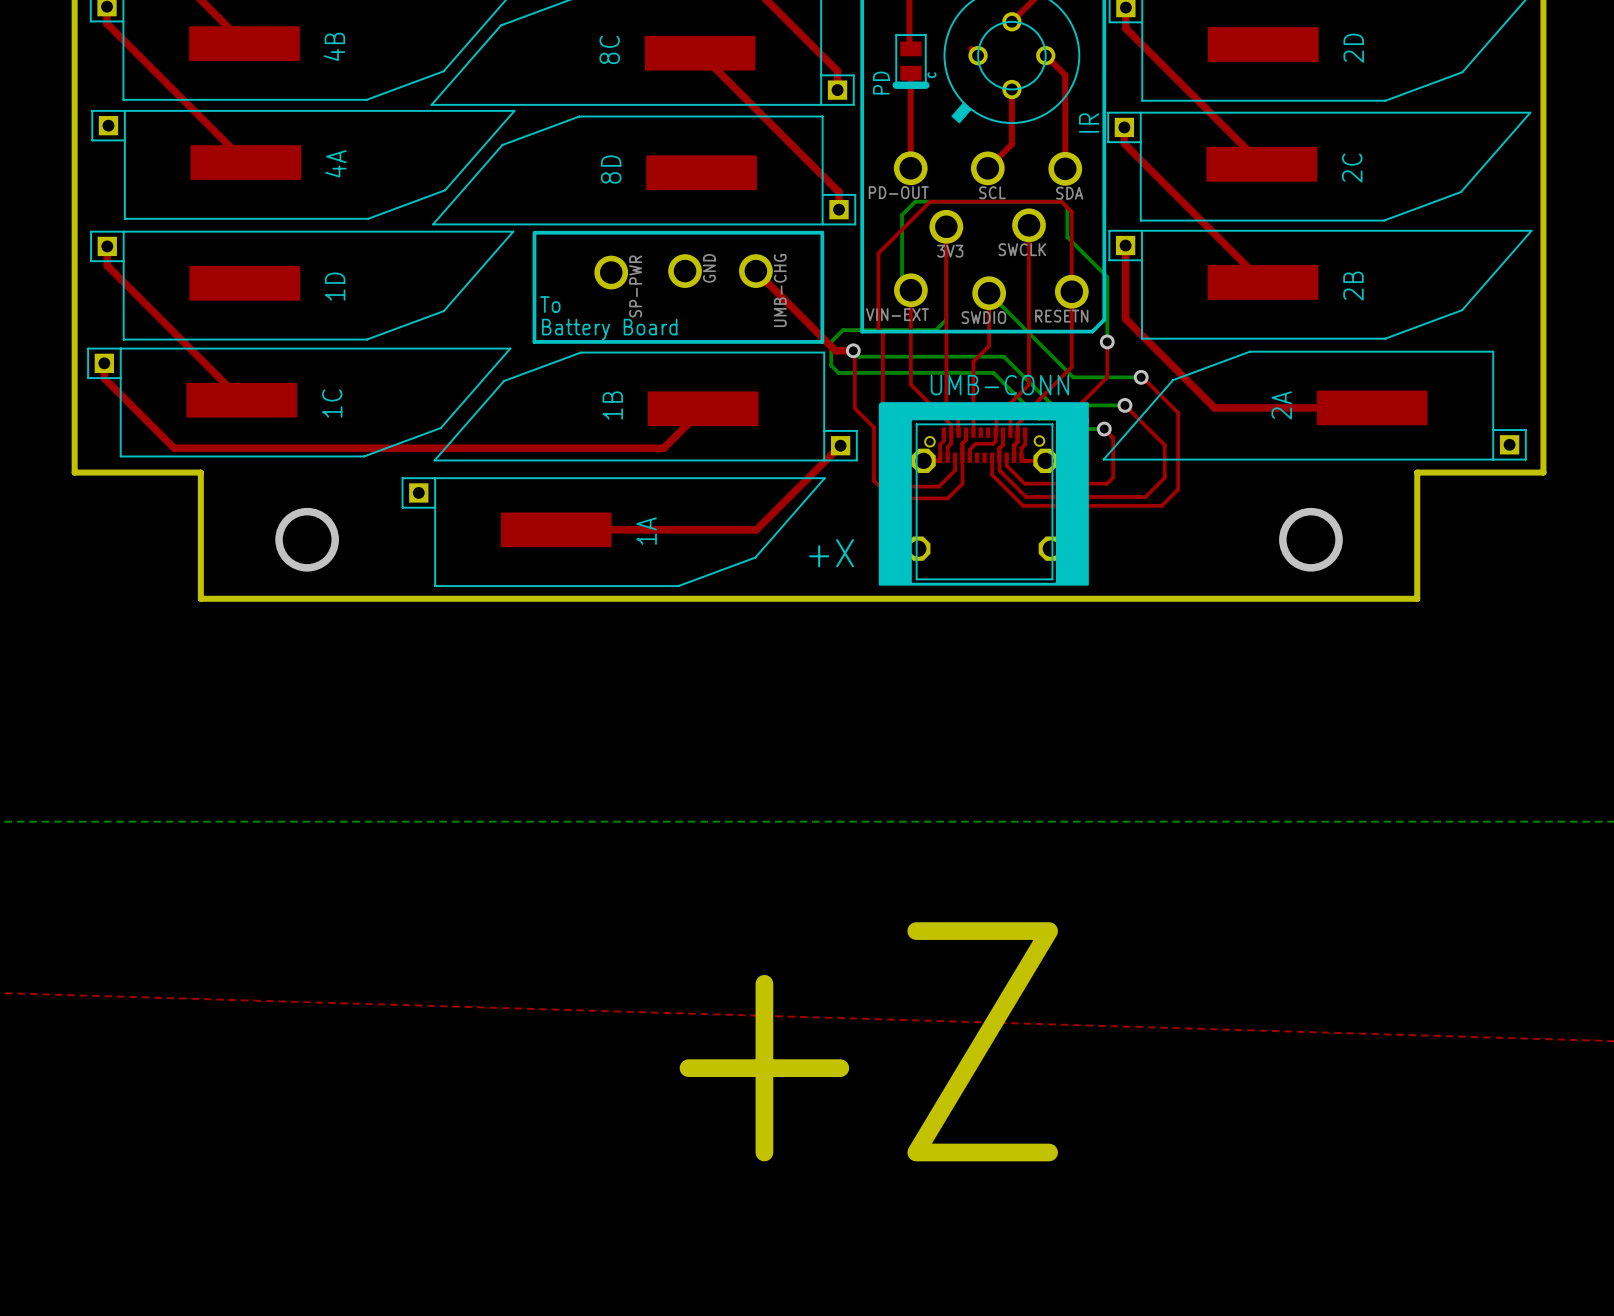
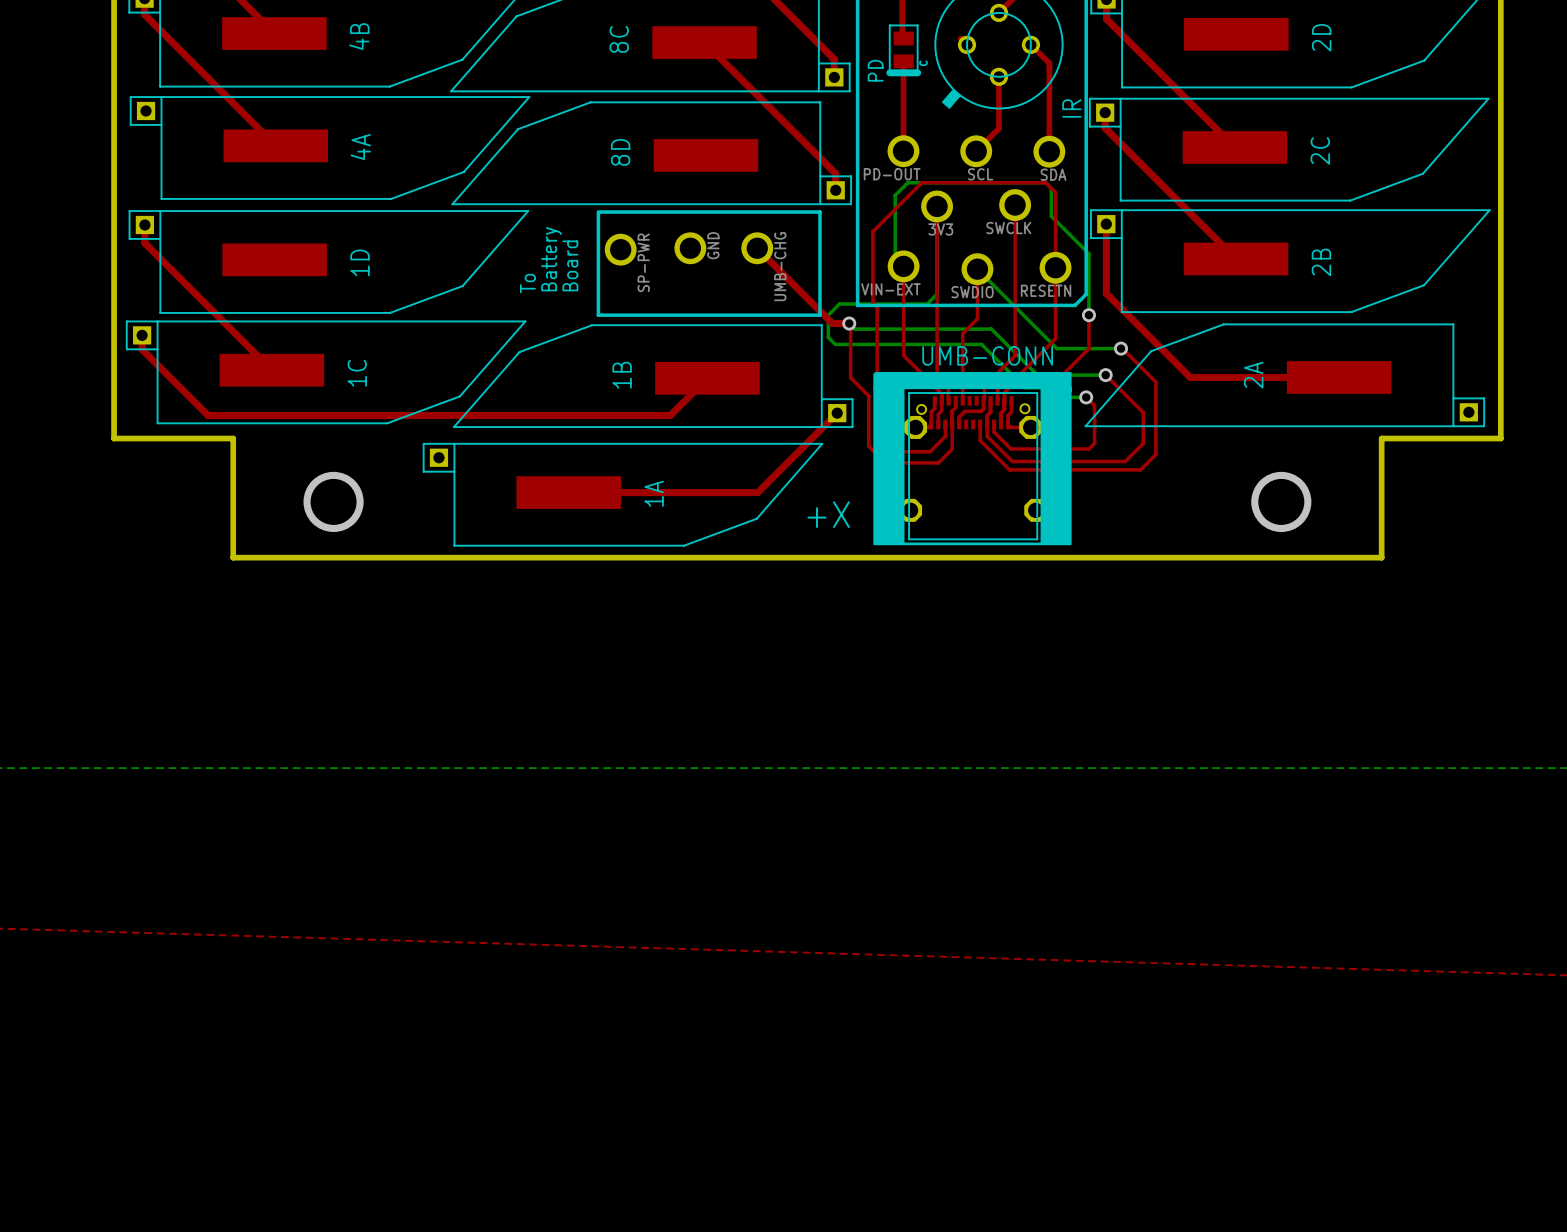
line: (534, 232) (587, 232) -> none
line: (534, 234) (534, 341) (587, 341) -> (598, 213) (598, 315)
text: none -> Board (570, 265)
text: To (550, 304) -> Battery (551, 259)
text: none -> To (527, 283)
text: Battery Board (609, 329) -> none
text: +Z (868, 1041) -> none

